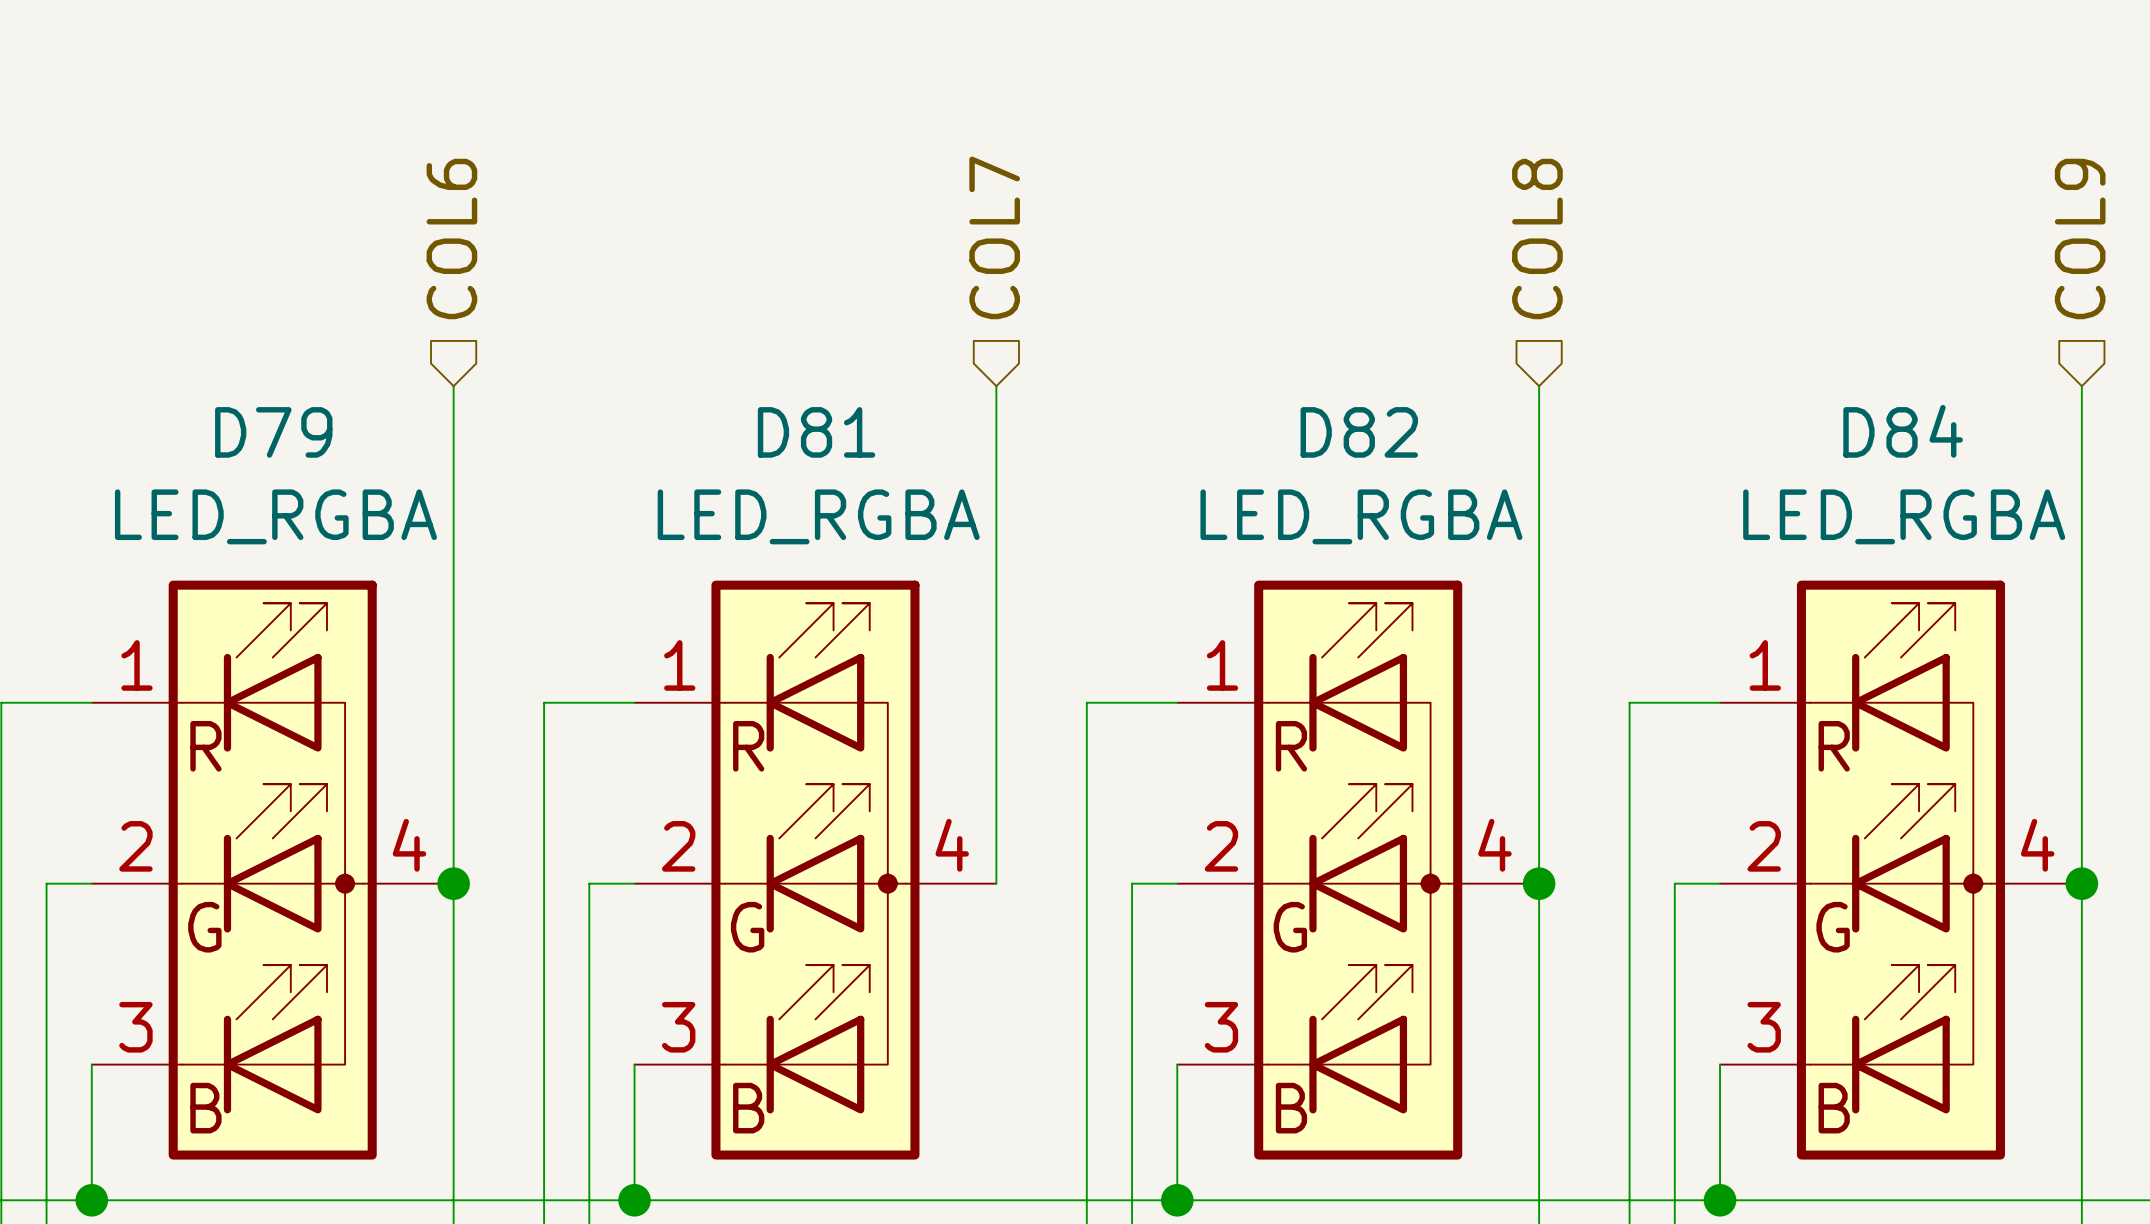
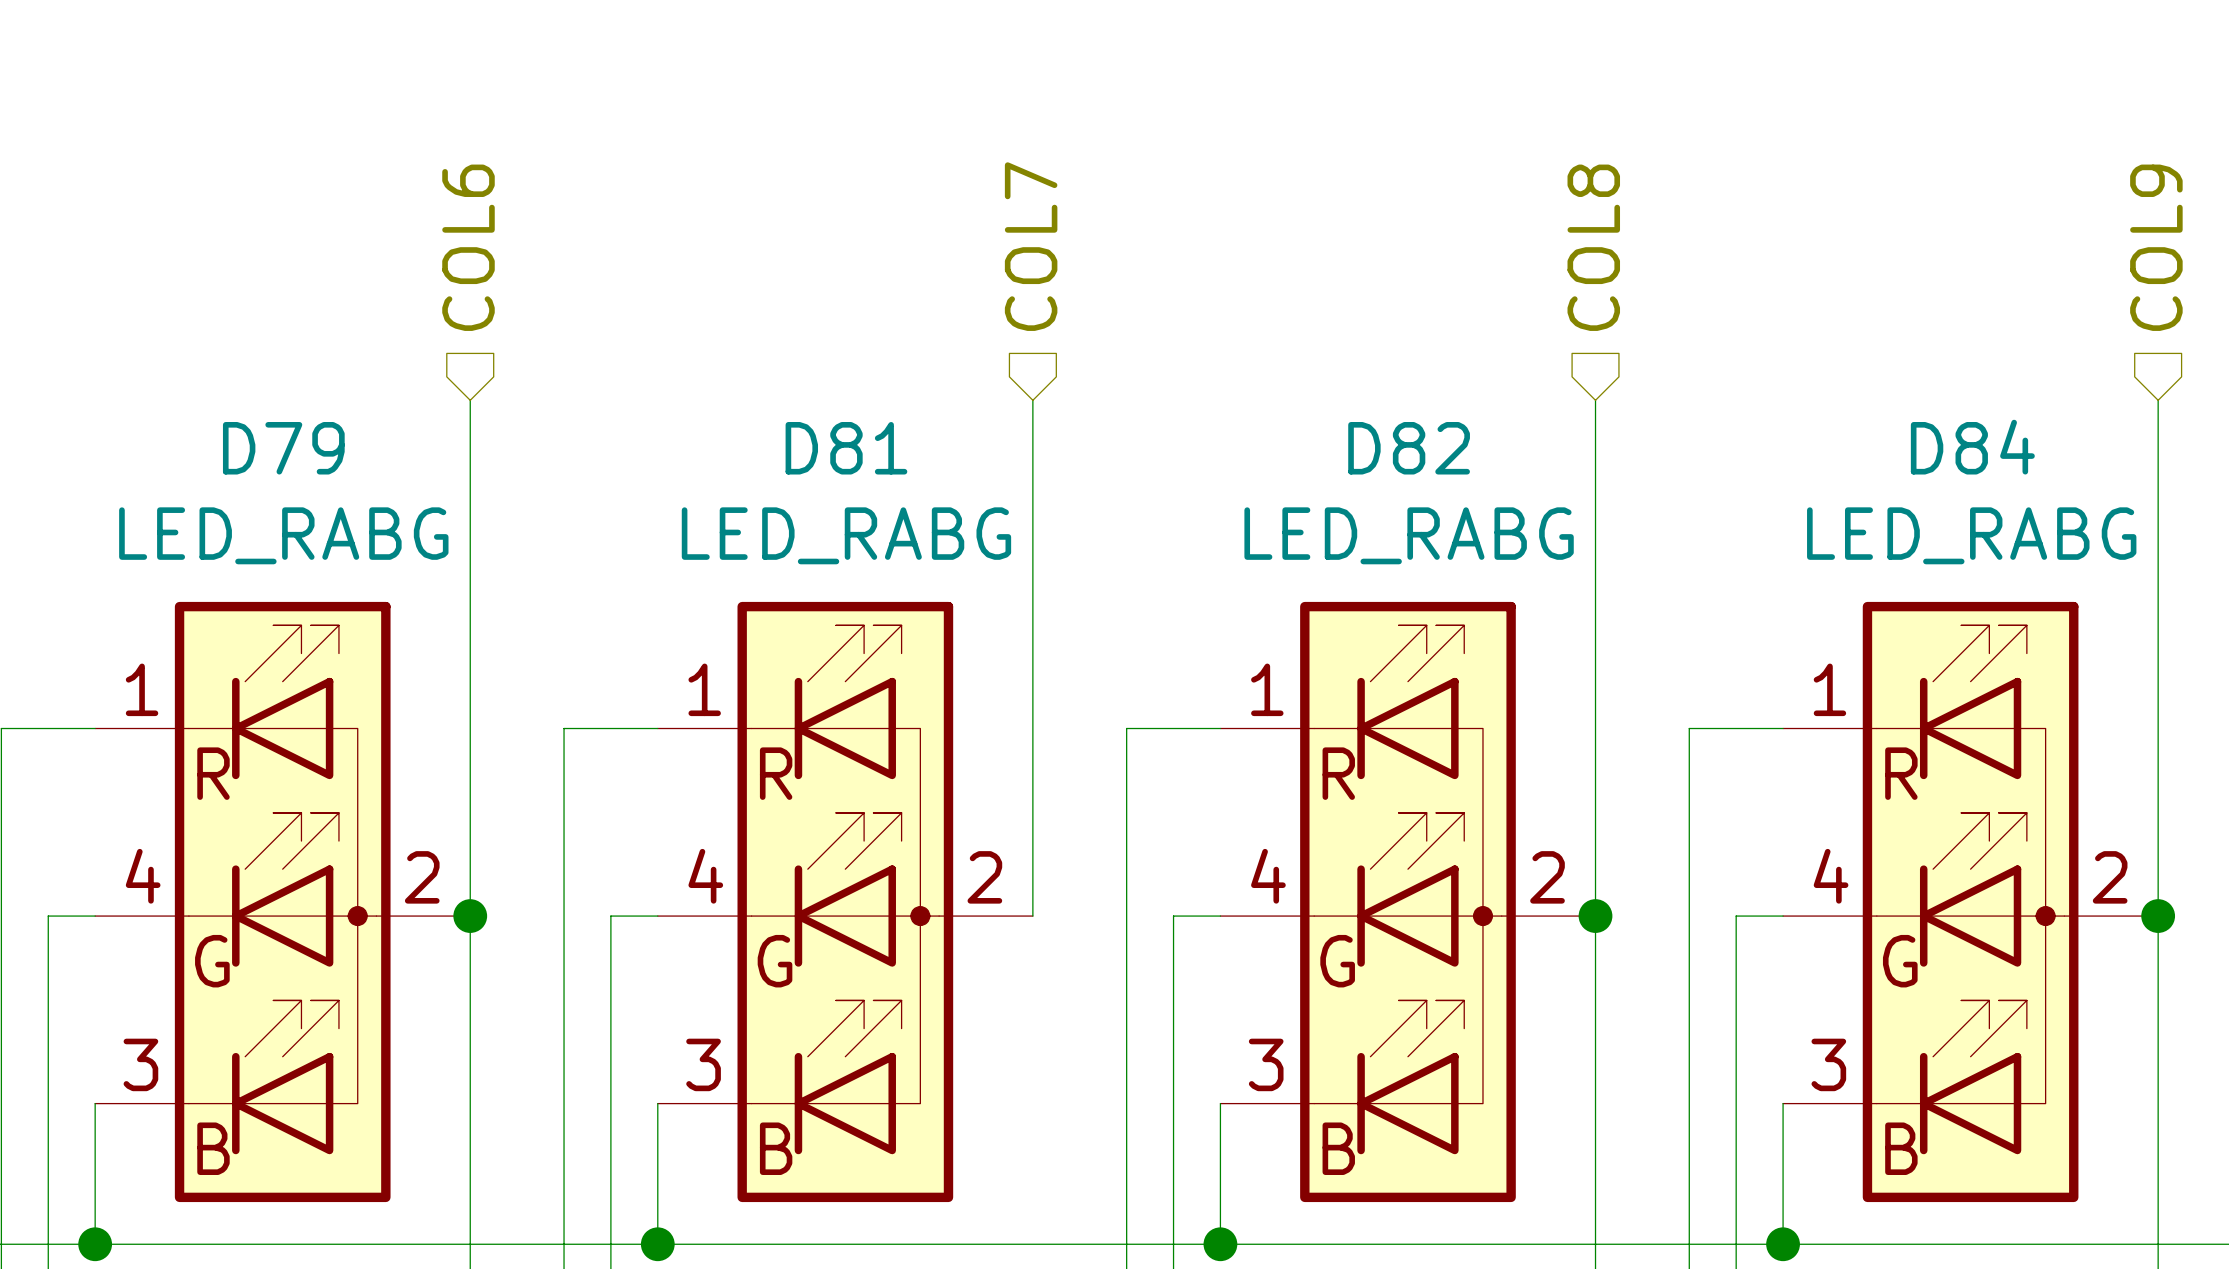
D79 value: LED_RGBA (275, 516) -> LED_RABG (283, 535)
D81 value: LED_RGBA (818, 516) -> LED_RABG (846, 535)
D82 value: LED_RGBA (1361, 516) -> LED_RABG (1409, 535)
D84 value: LED_RGBA (1904, 516) -> LED_RABG (1971, 535)
D79 pin number: 4 (409, 845) -> 2 (422, 877)
D81 pin number: 4 (952, 845) -> 2 (984, 877)
D82 pin number: 4 (1494, 845) -> 2 (1547, 877)
D84 pin number: 4 (2037, 845) -> 2 (2110, 877)
D79 pin number: 2 (135, 846) -> 4 (143, 876)
D81 pin number: 2 (678, 846) -> 4 (705, 876)
D82 pin number: 2 (1221, 846) -> 4 (1268, 876)
D84 pin number: 2 (1764, 846) -> 4 (1831, 876)

